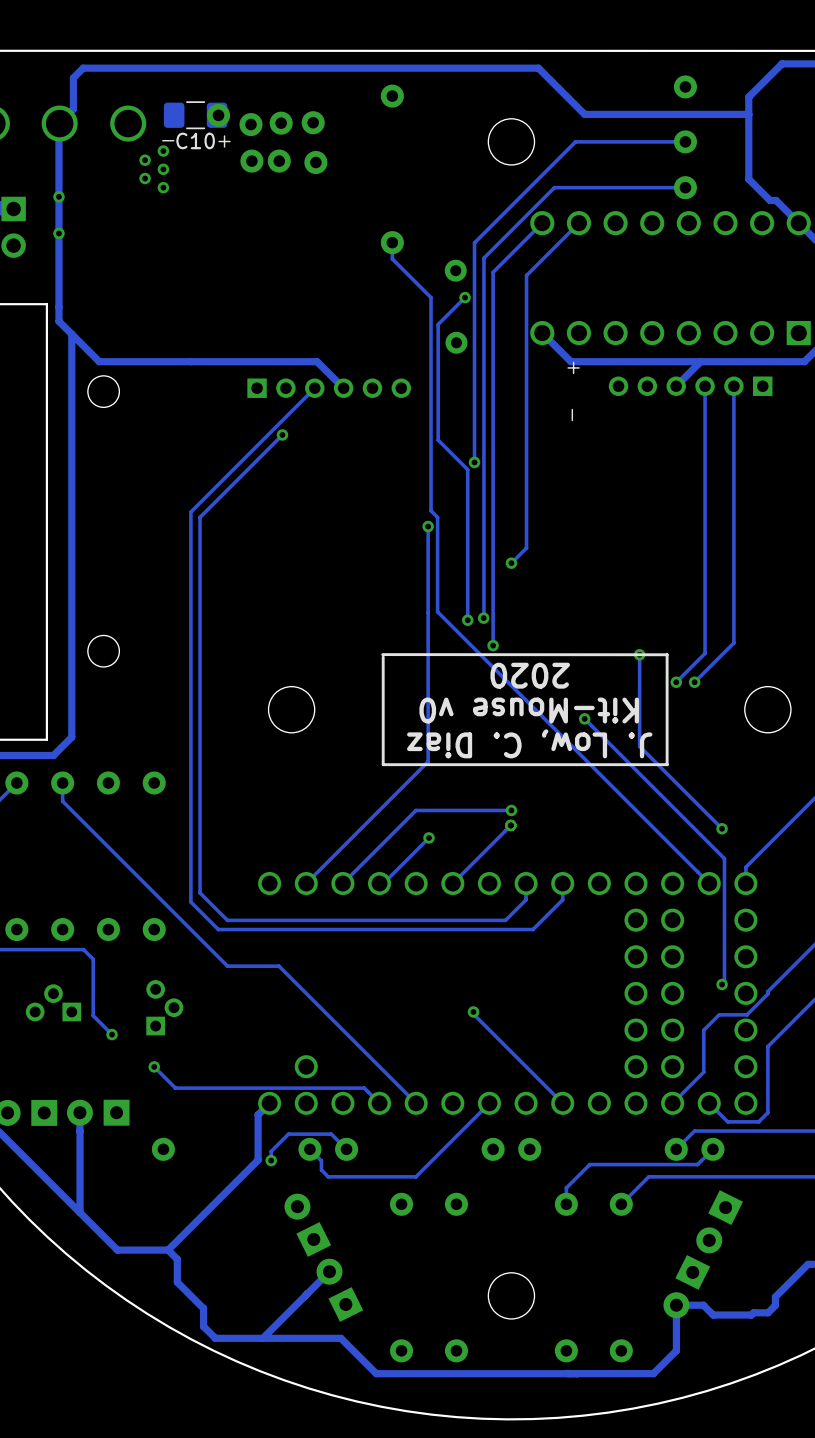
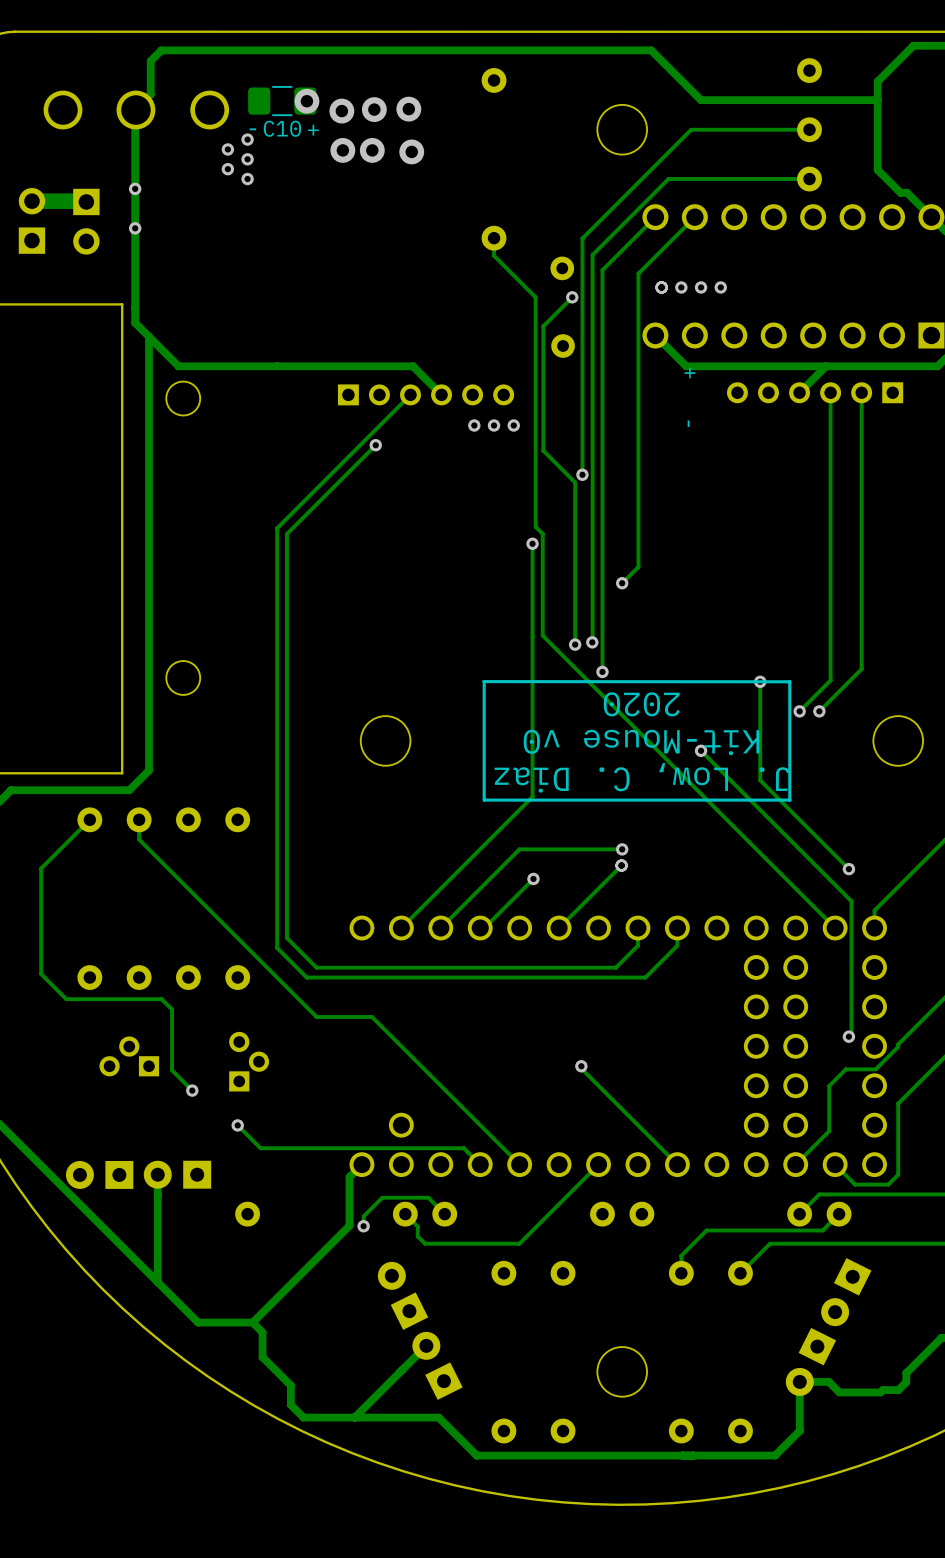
via: none -> (661, 287)
via: none -> (681, 287)
via: none -> (701, 287)
via: none -> (720, 287)
via: none -> (474, 425)
via: none -> (494, 425)
via: none -> (513, 425)

